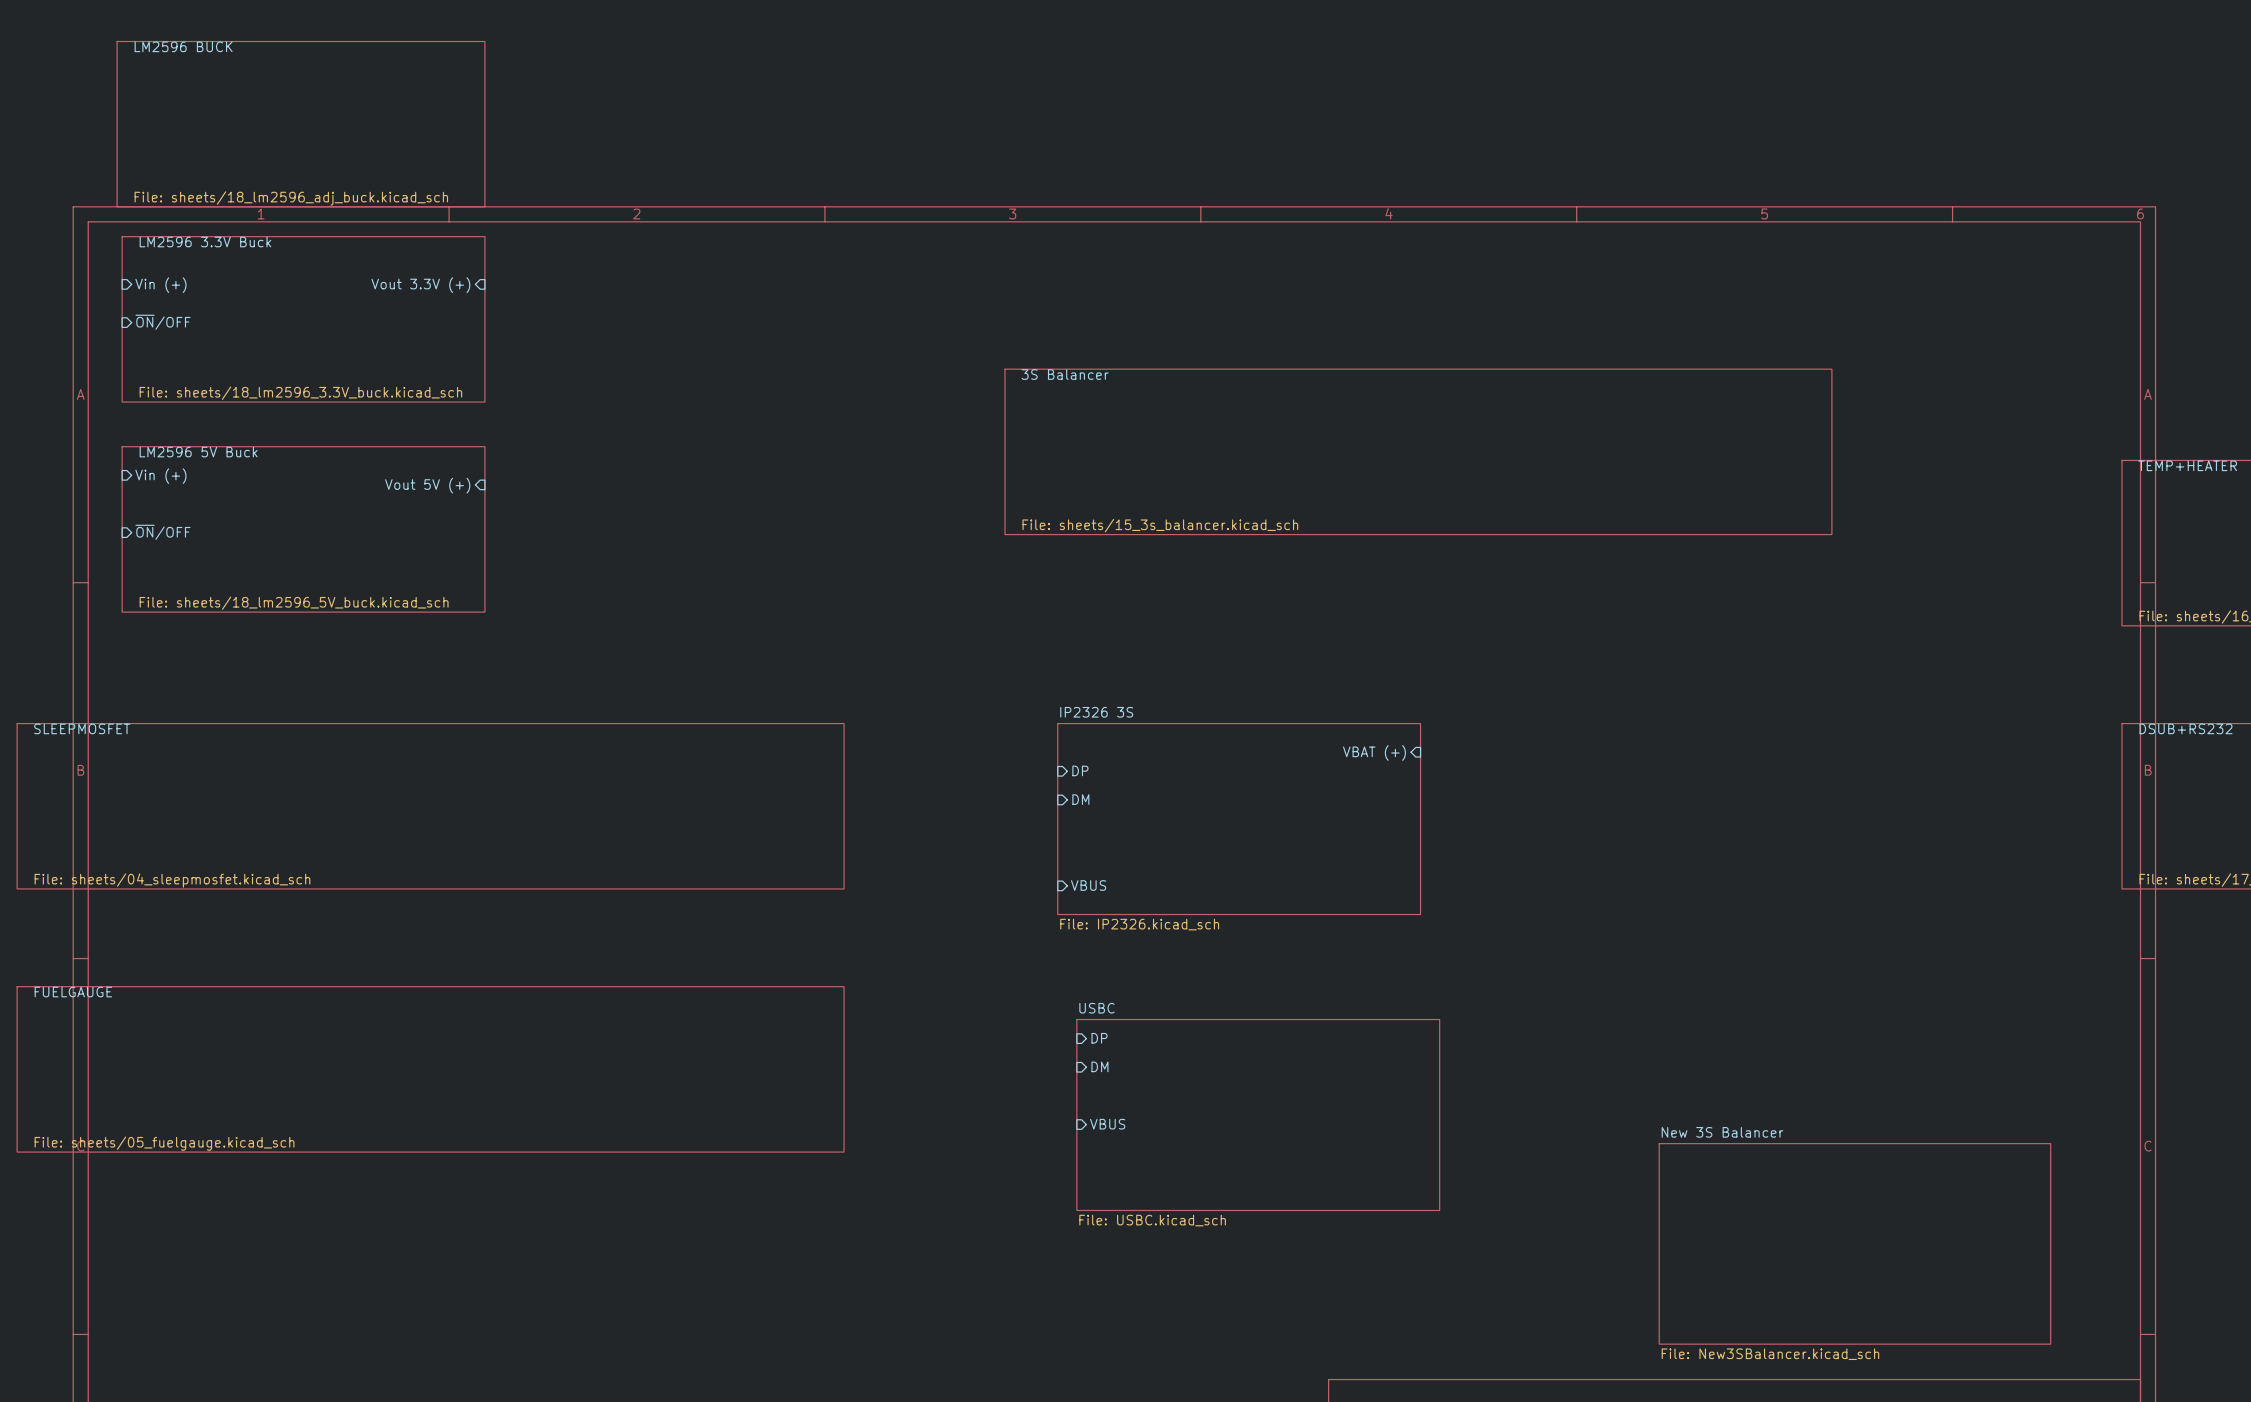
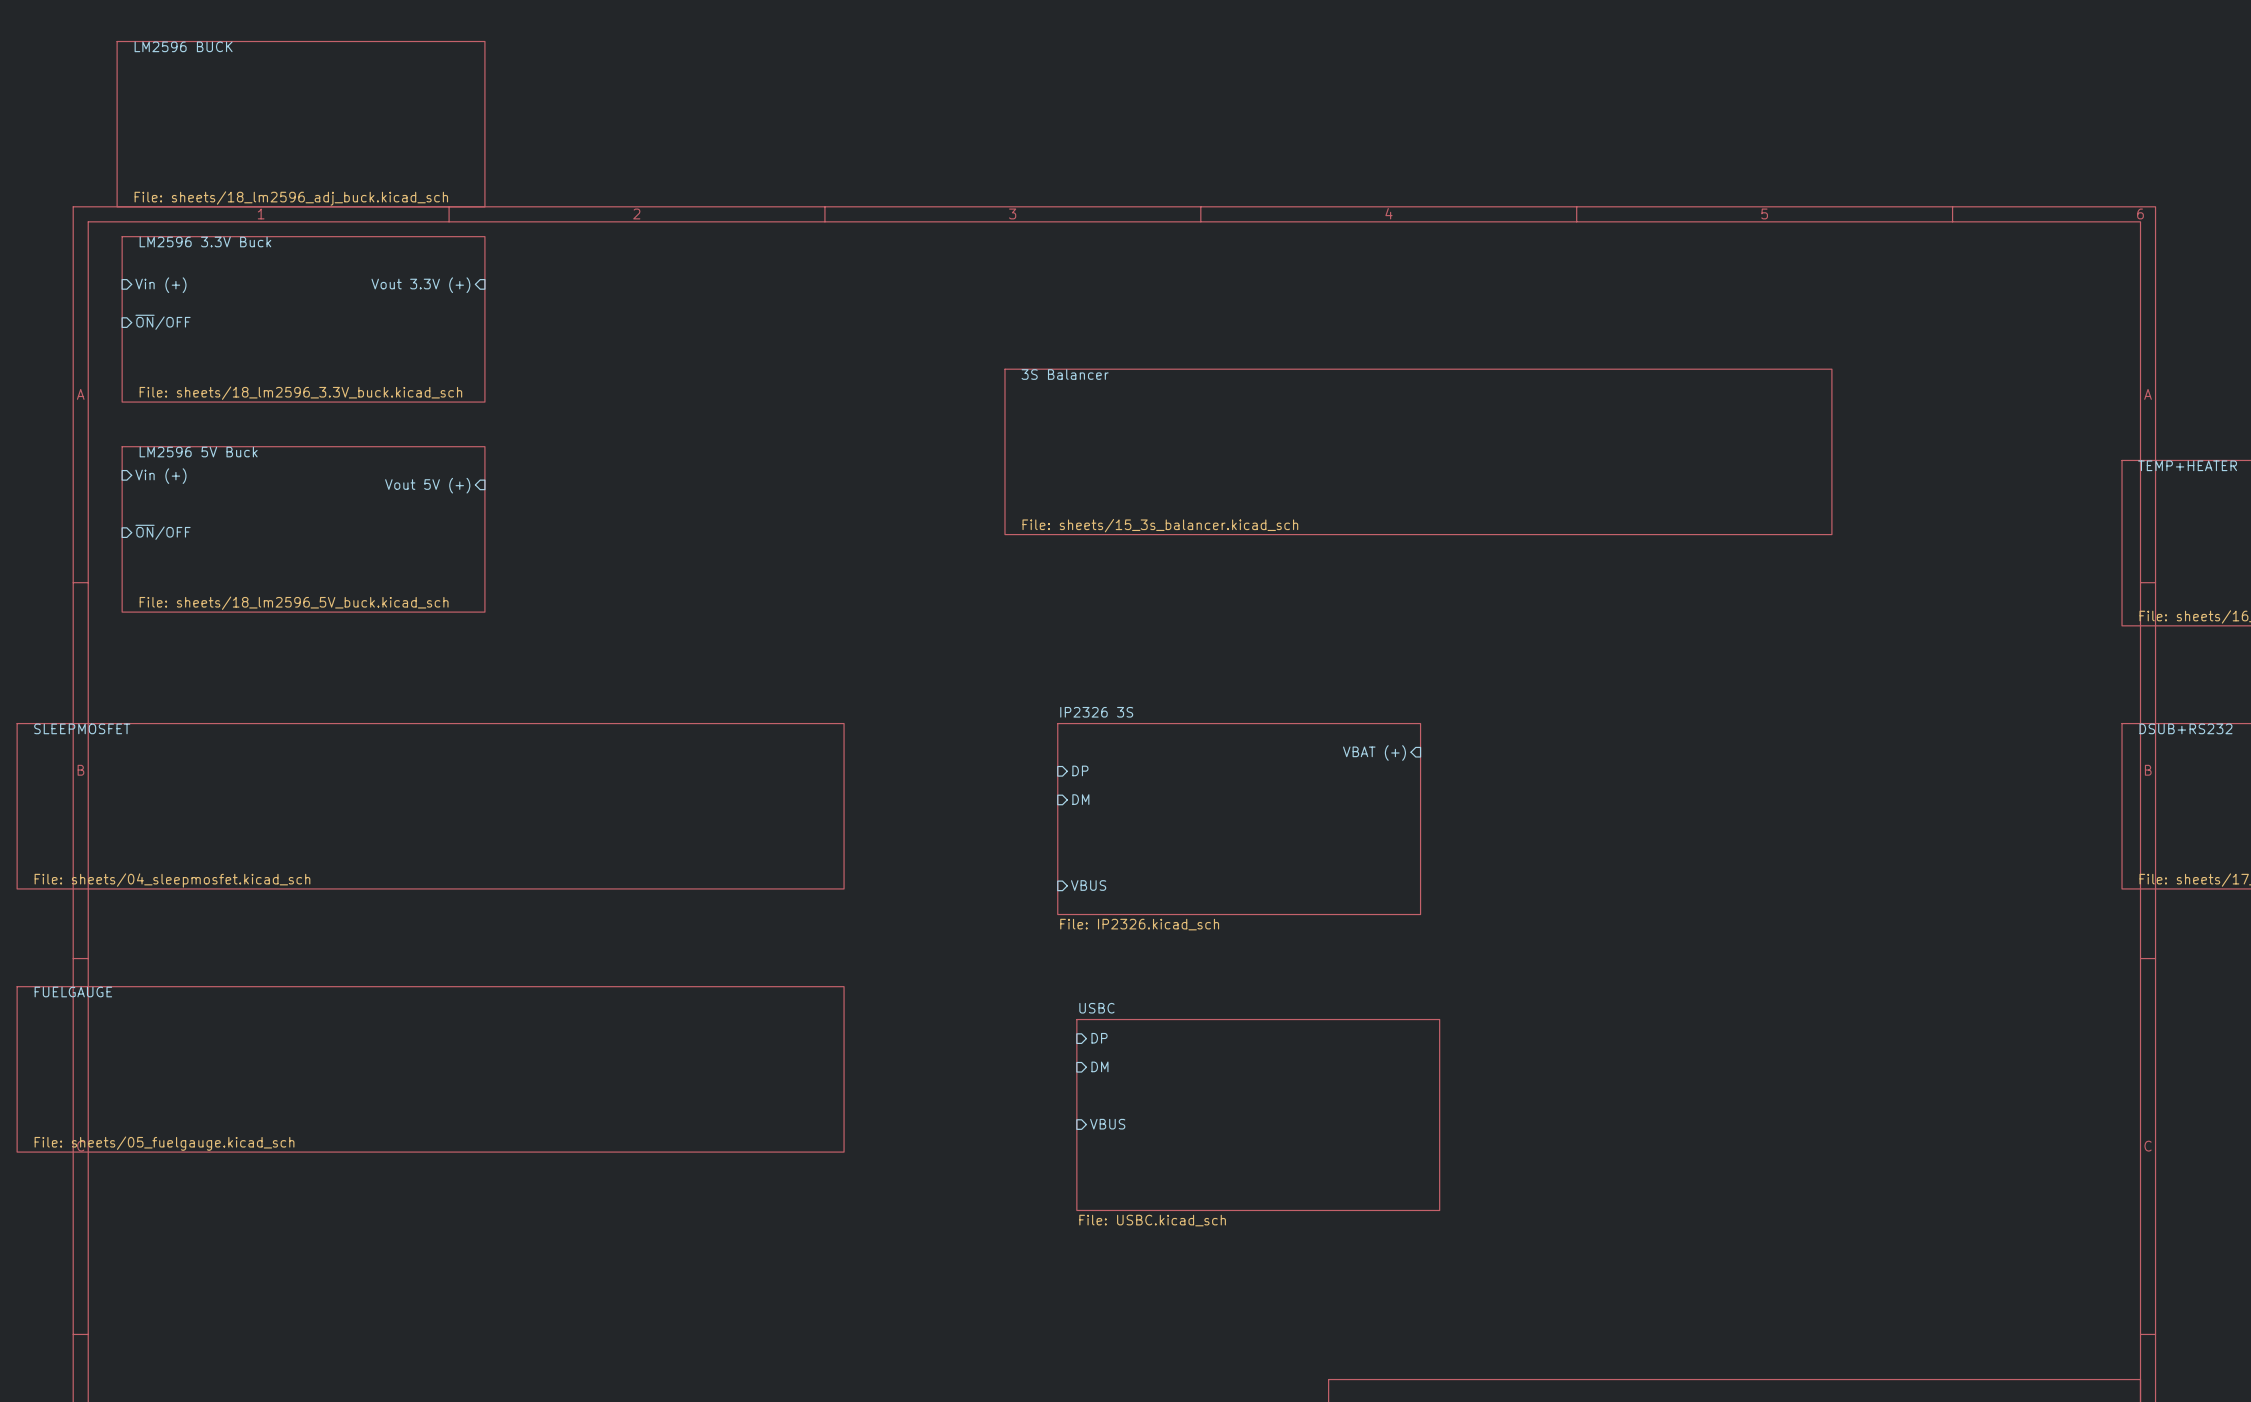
sheet New 3S Balancer: File: New3SBalancer.kicad_sch (1854, 1243) -> none

